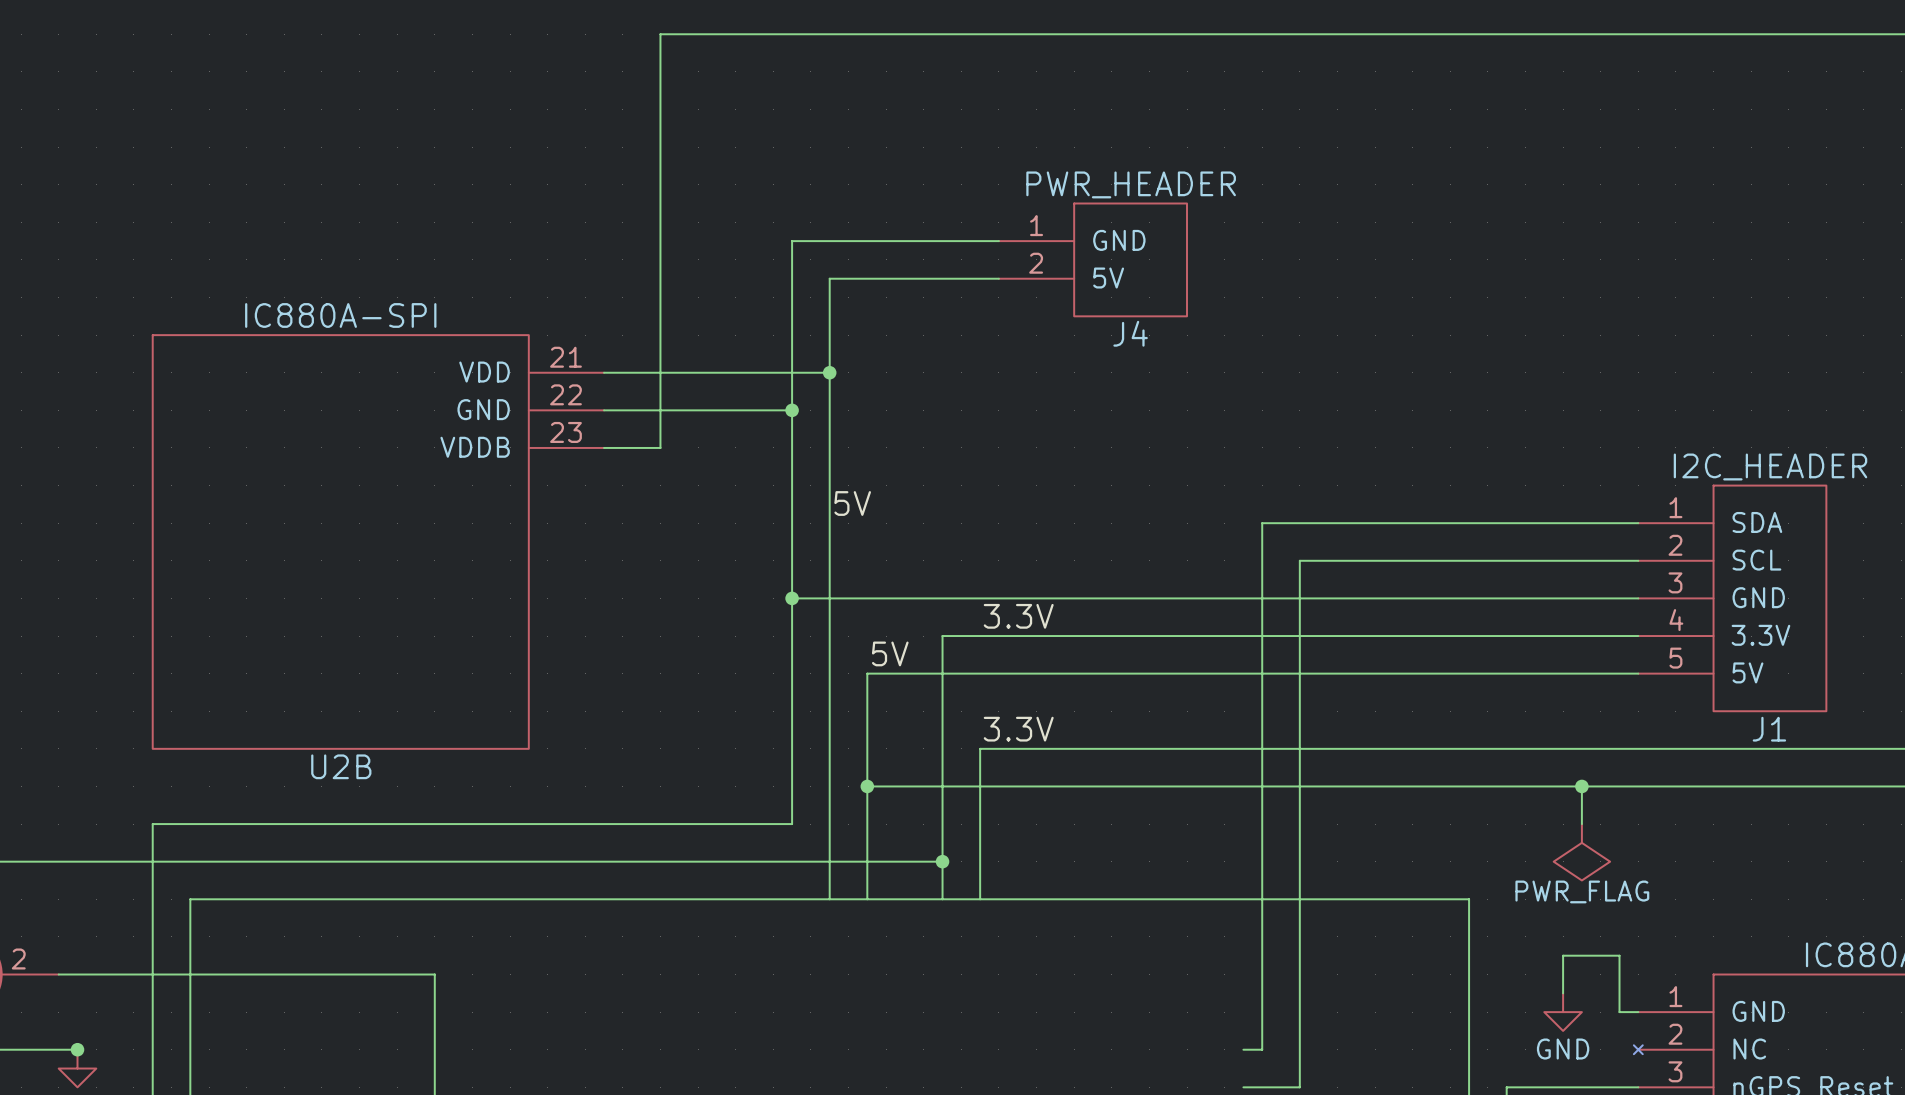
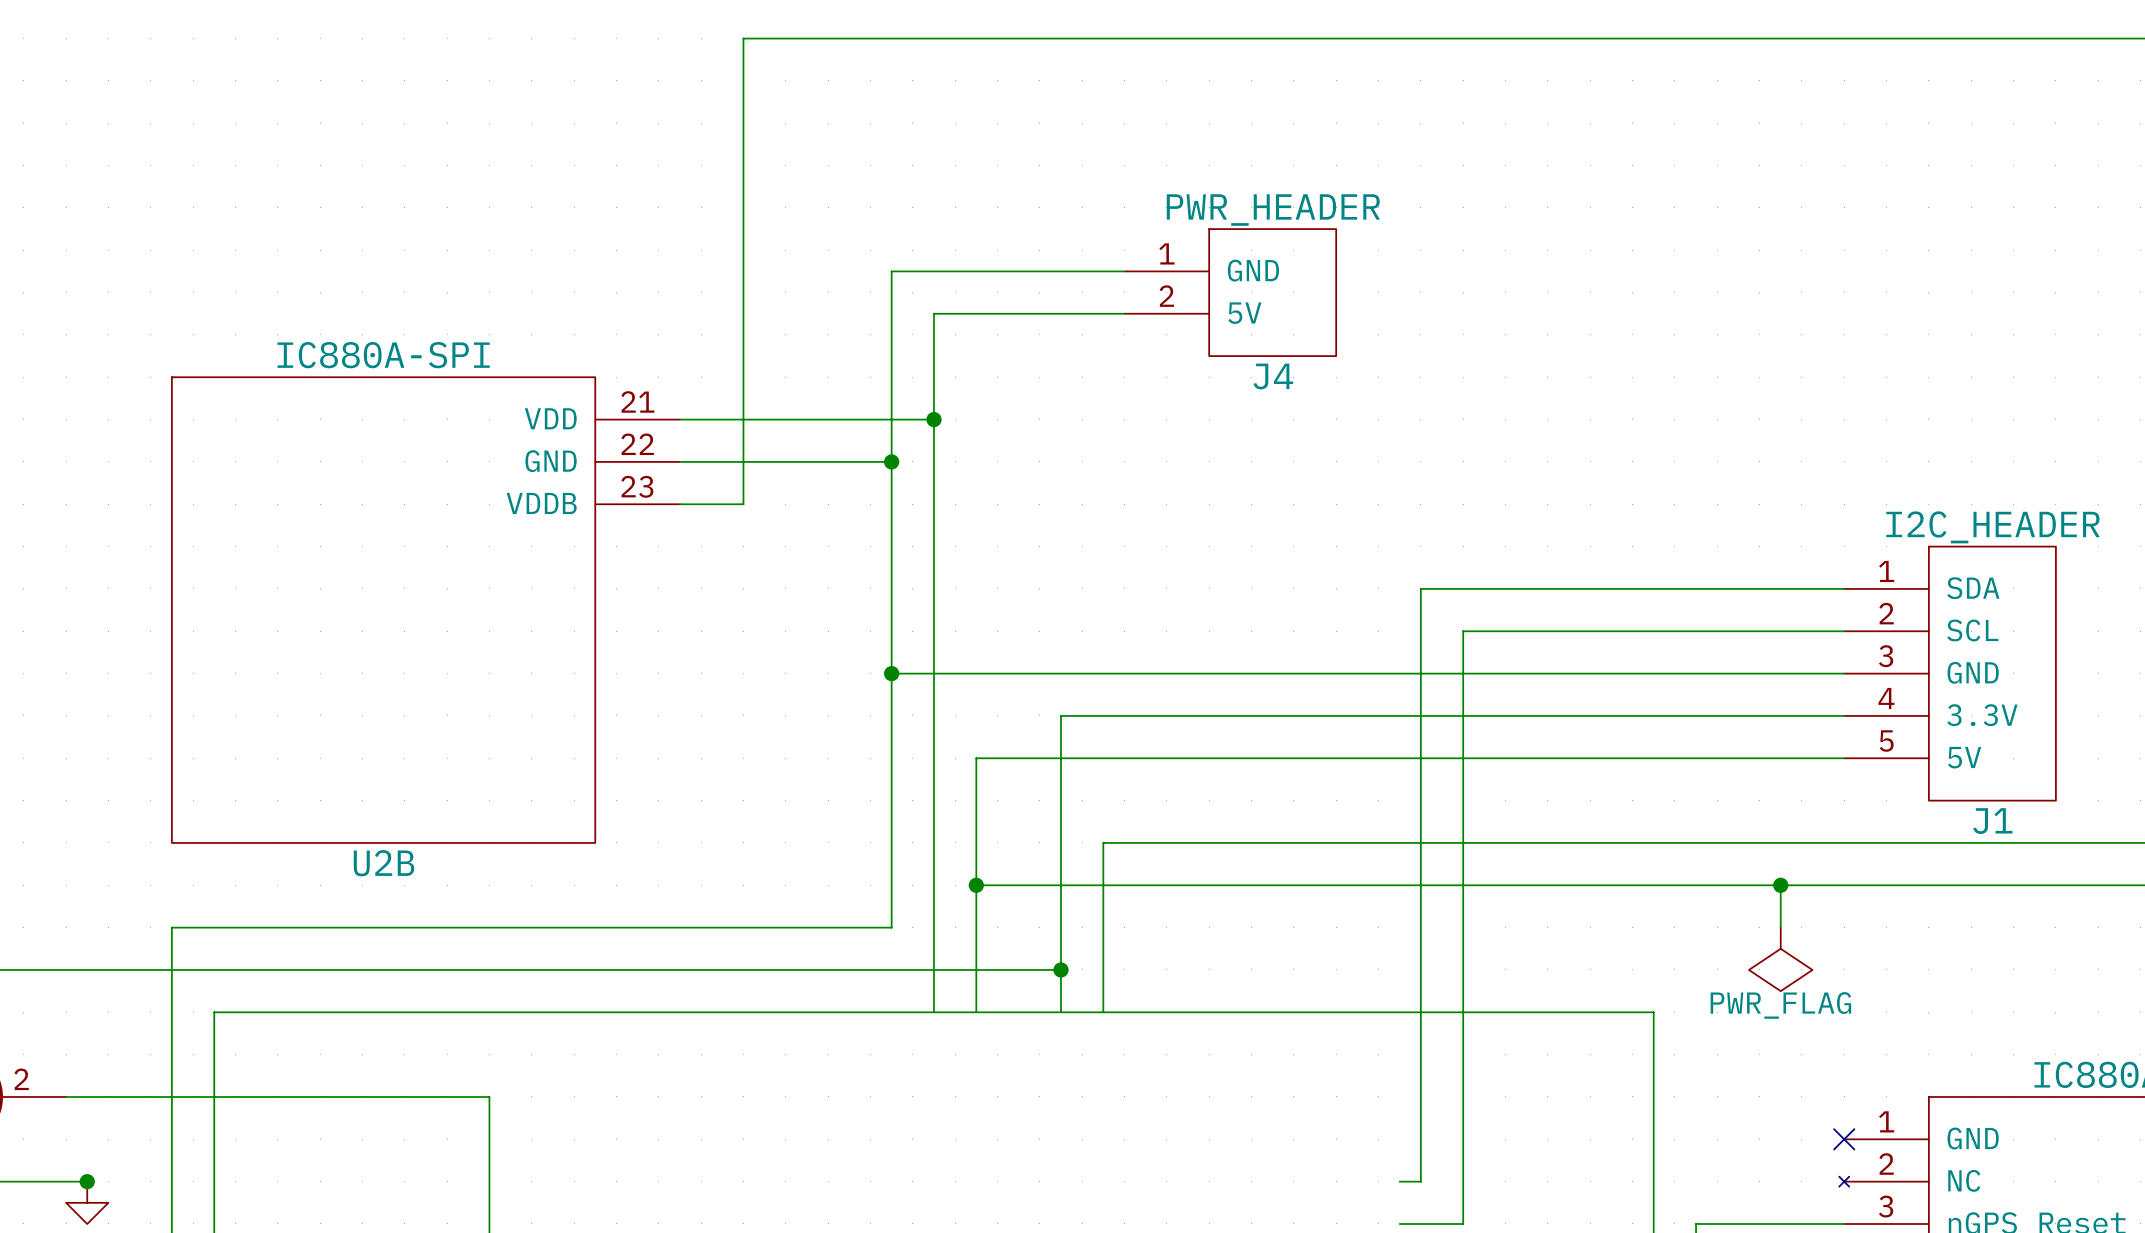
label: 5V (852, 503) -> none
label: 3.3V (1018, 616) -> none
label: 5V (890, 653) -> none
label: 3.3V (1018, 729) -> none
wire: (1563, 993) (1563, 955) (1619, 955) (1619, 1012) (1638, 1012) -> none
power symbol: GND (1563, 1012) -> none
no-connect mark: none -> (1844, 1139)

